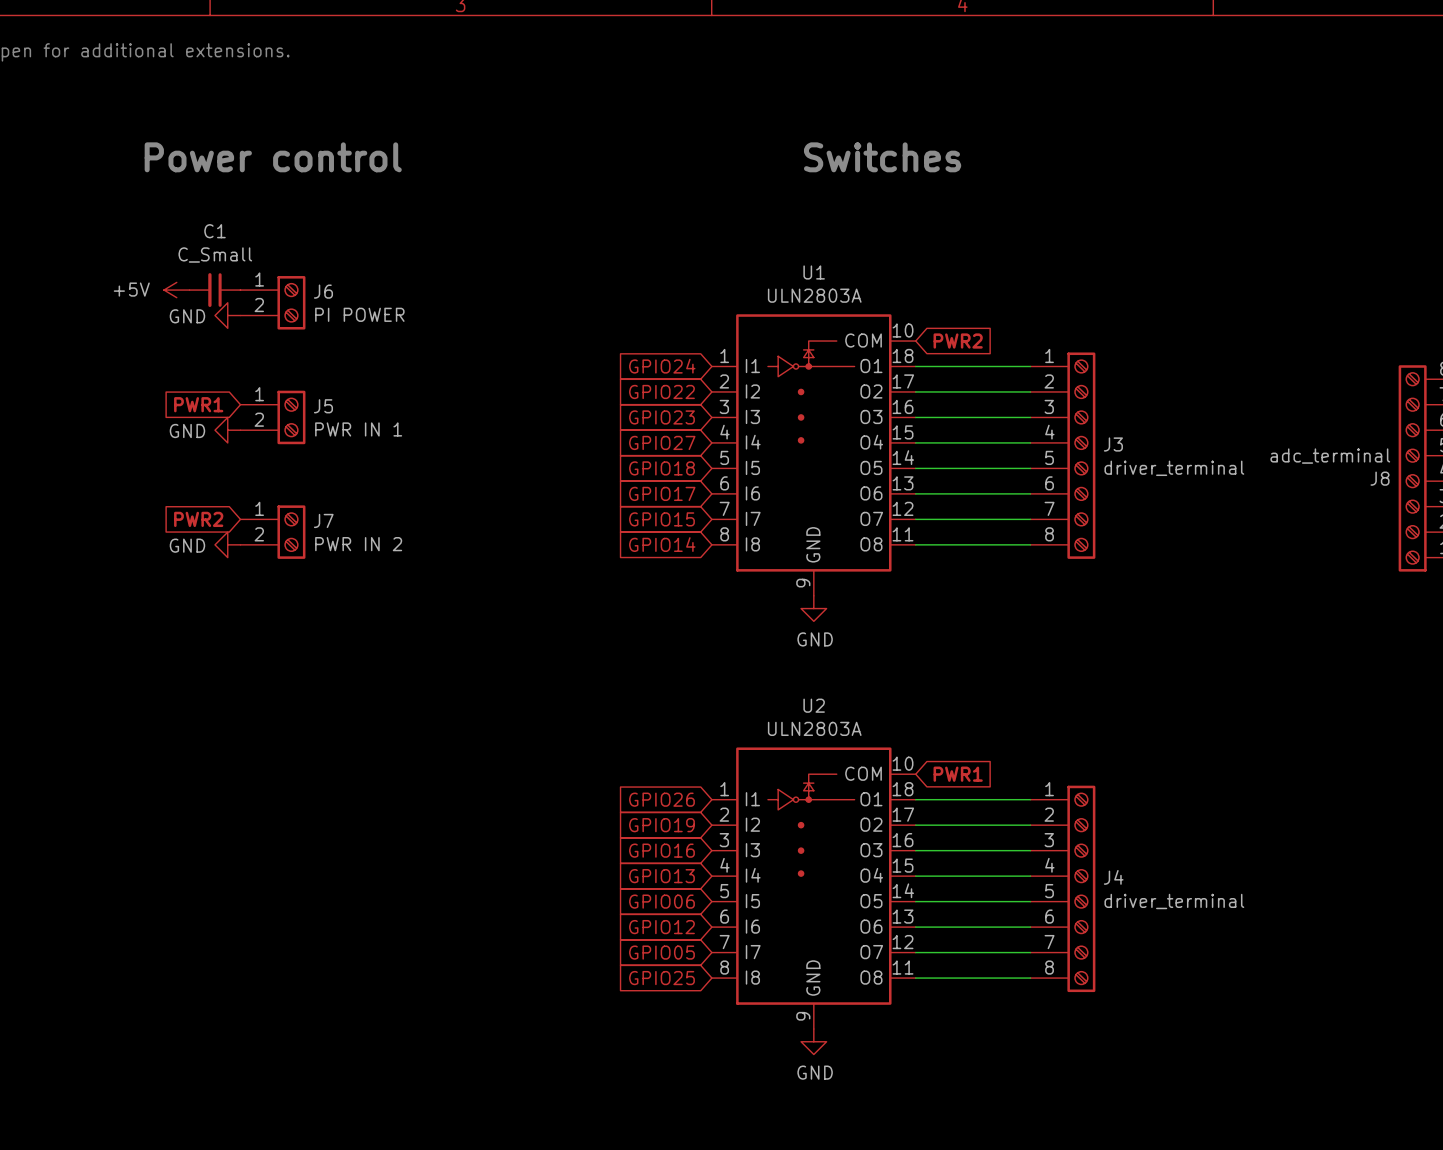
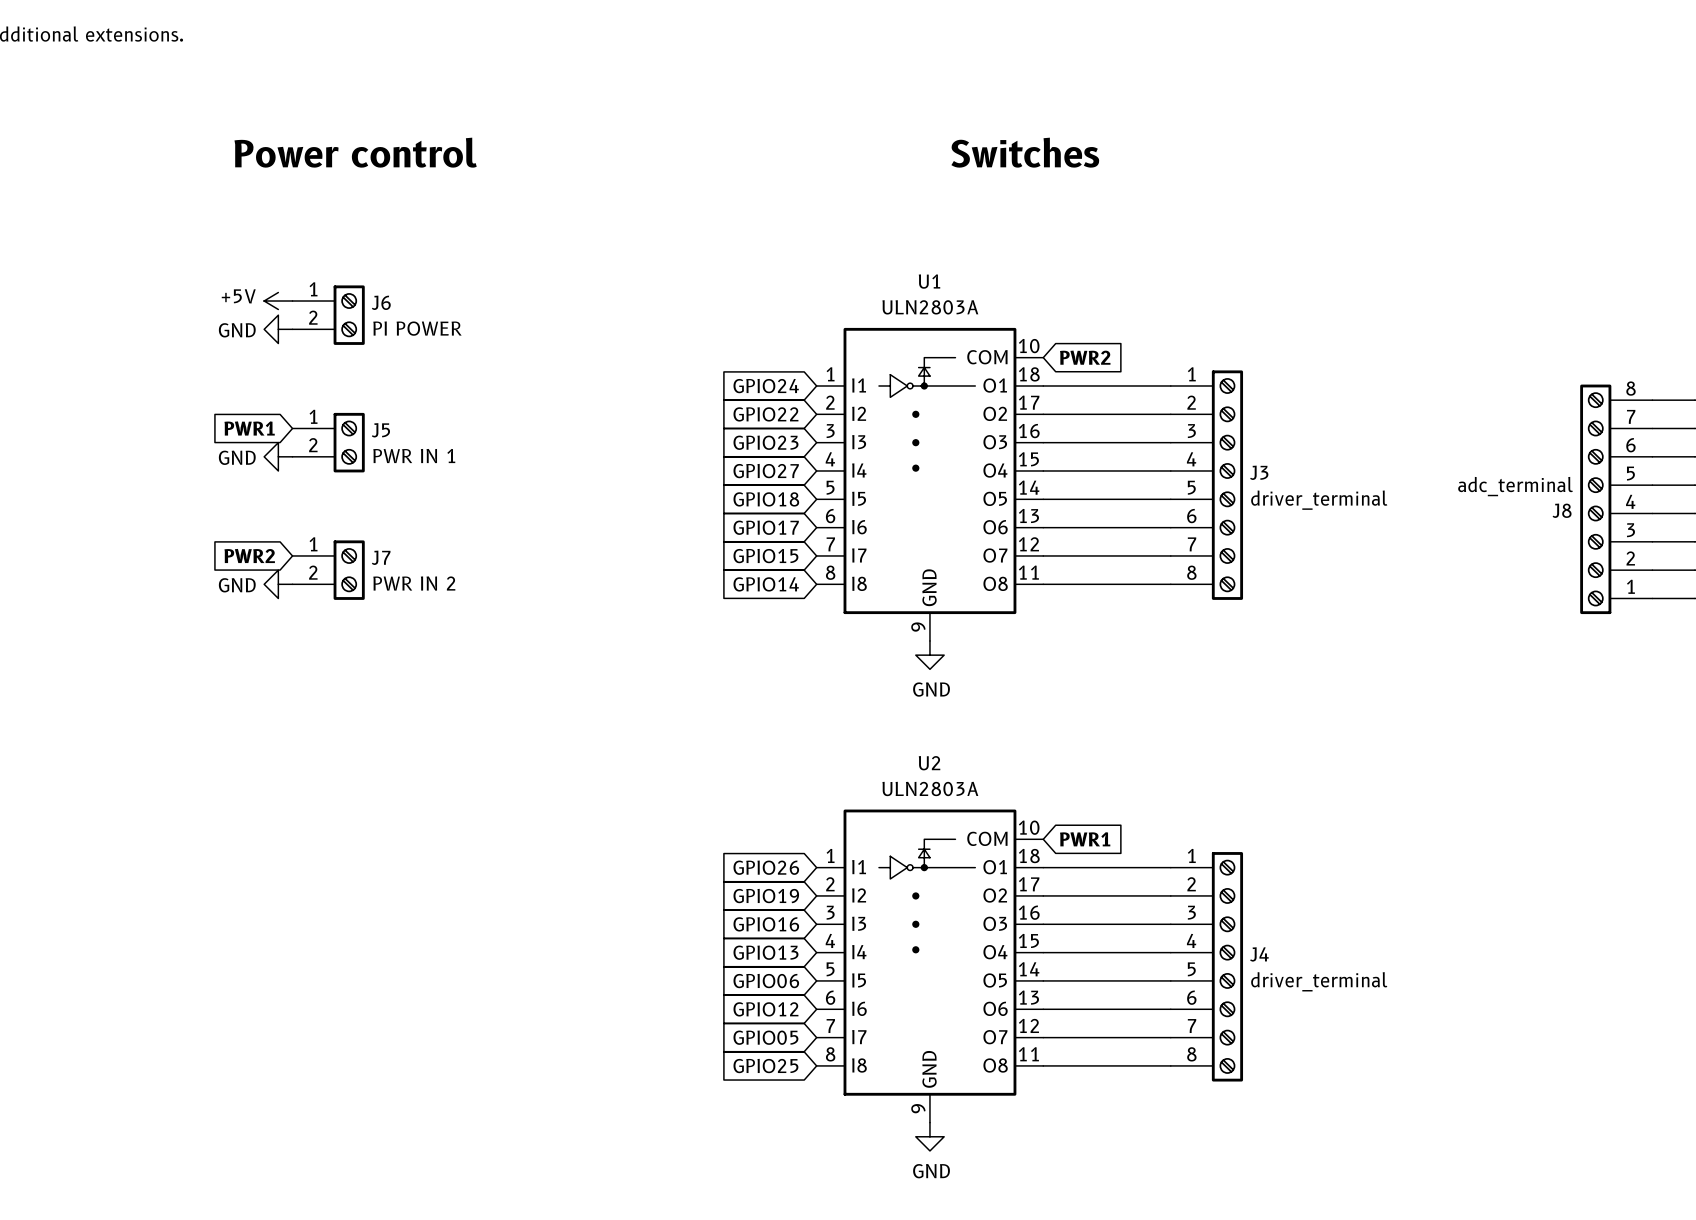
power symbol text position: +5V (131, 289) -> +5V (238, 296)
power symbol position: +5V (176, 290) -> +5V (278, 301)
C1: C_Small (215, 290) -> none

